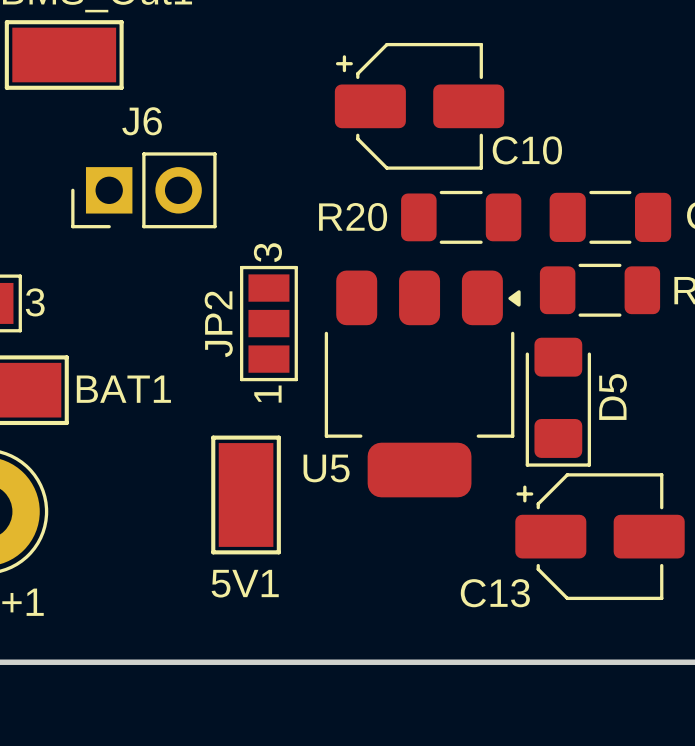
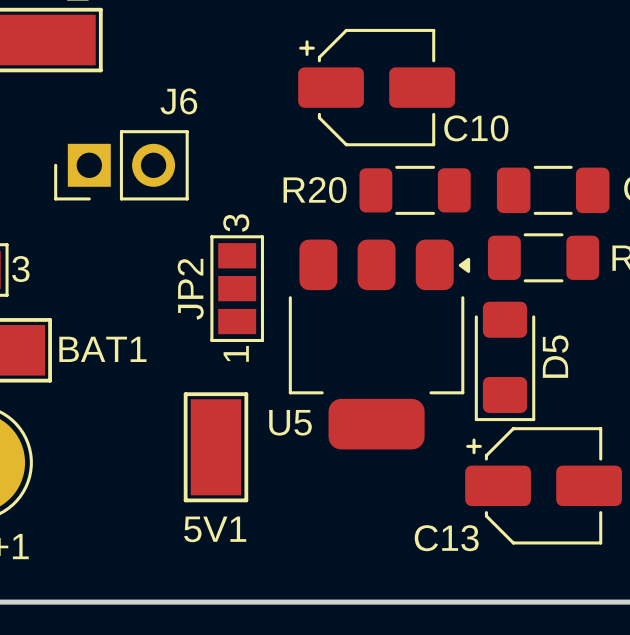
J6 name position: J6 (142, 121) -> J6 (178, 101)

